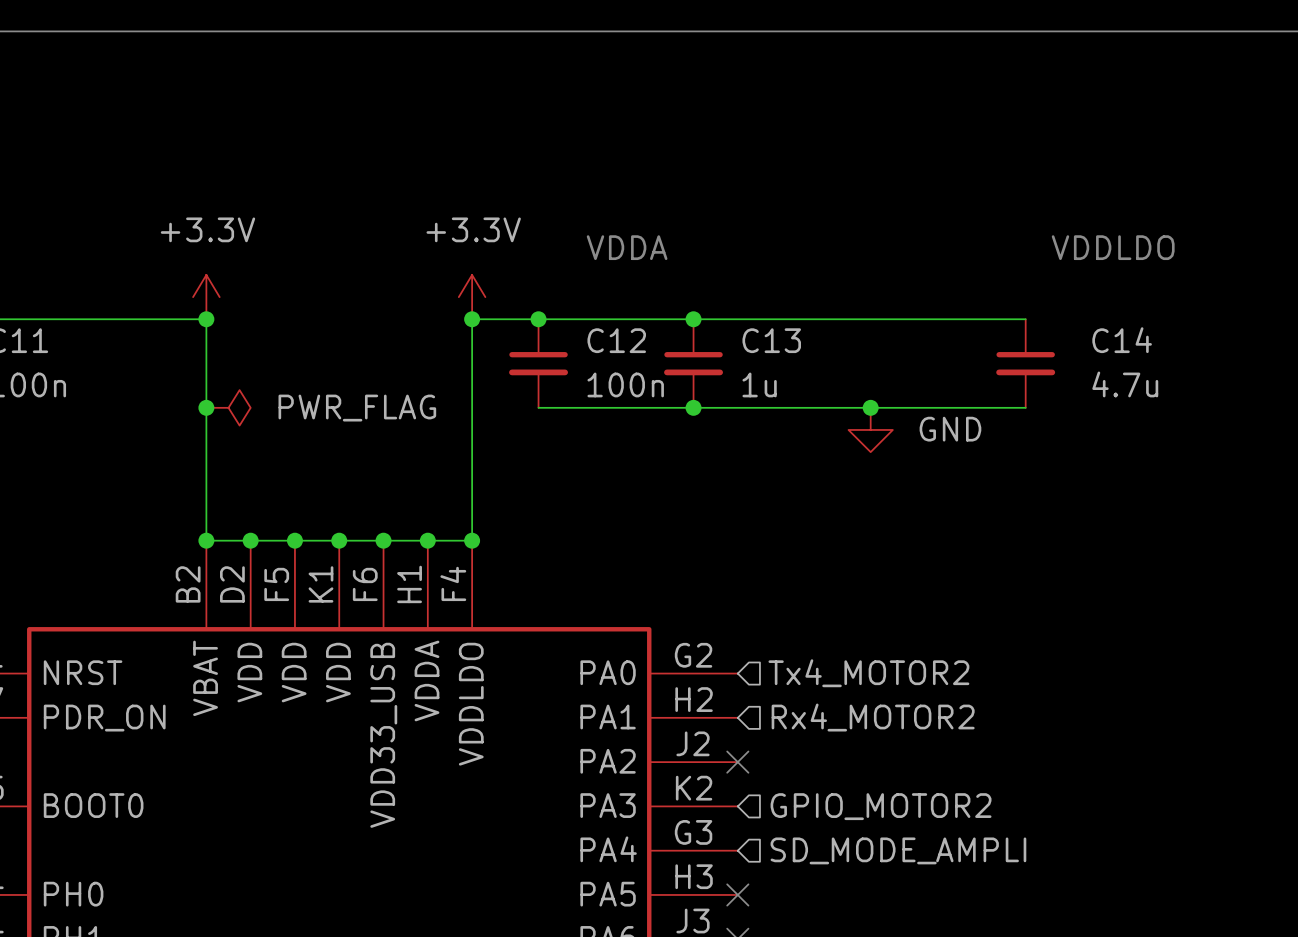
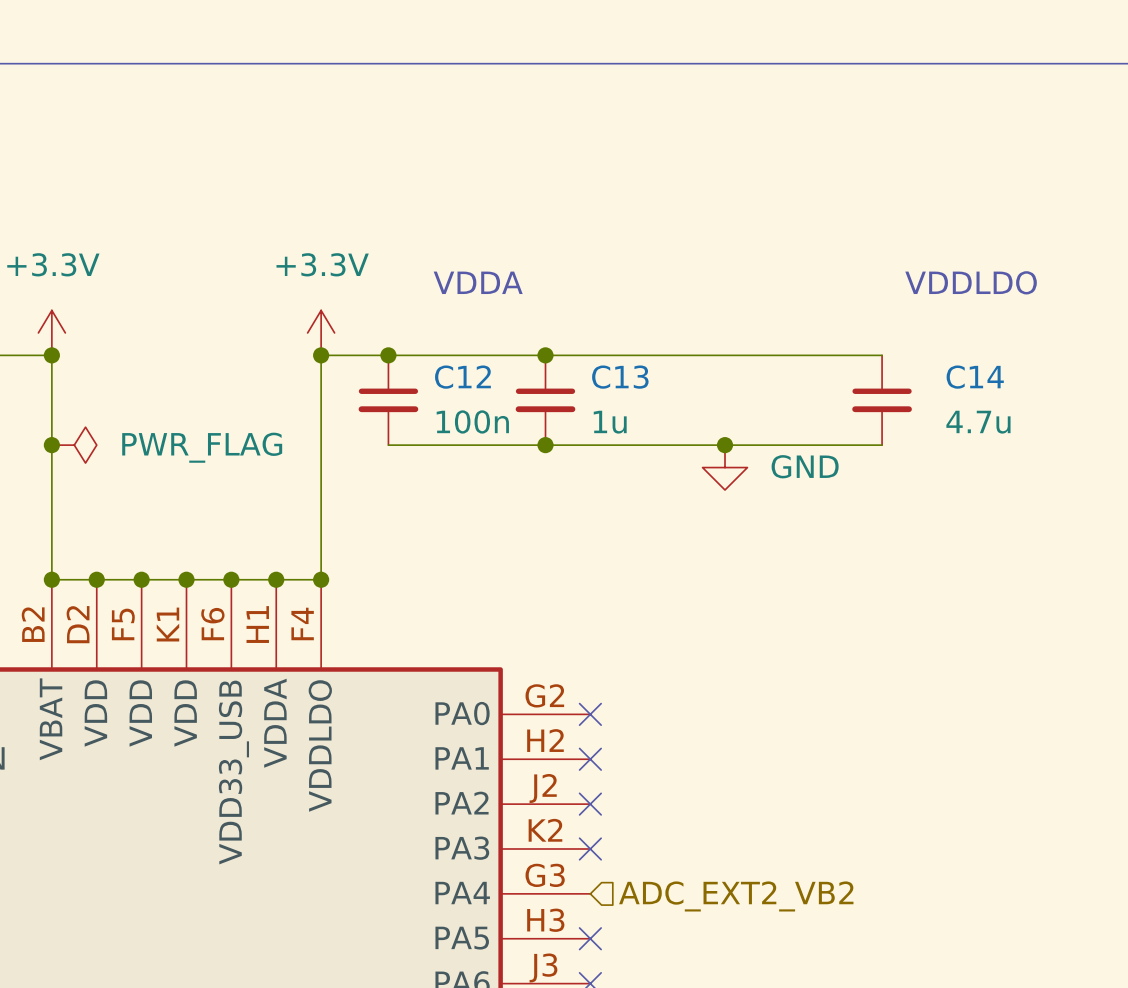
no-connect mark: none -> (590, 714)
hierarchical label: Tx4_MOTOR2 (868, 673) -> none
no-connect mark: none -> (590, 759)
hierarchical label: Rx4_MOTOR2 (873, 717) -> none
no-connect mark: none -> (590, 848)
hierarchical label: GPIO_MOTOR2 (881, 806) -> none
hierarchical label: SD_MODE_AMPLI (898, 850) -> ADC_EXT2_VB2 (736, 896)

